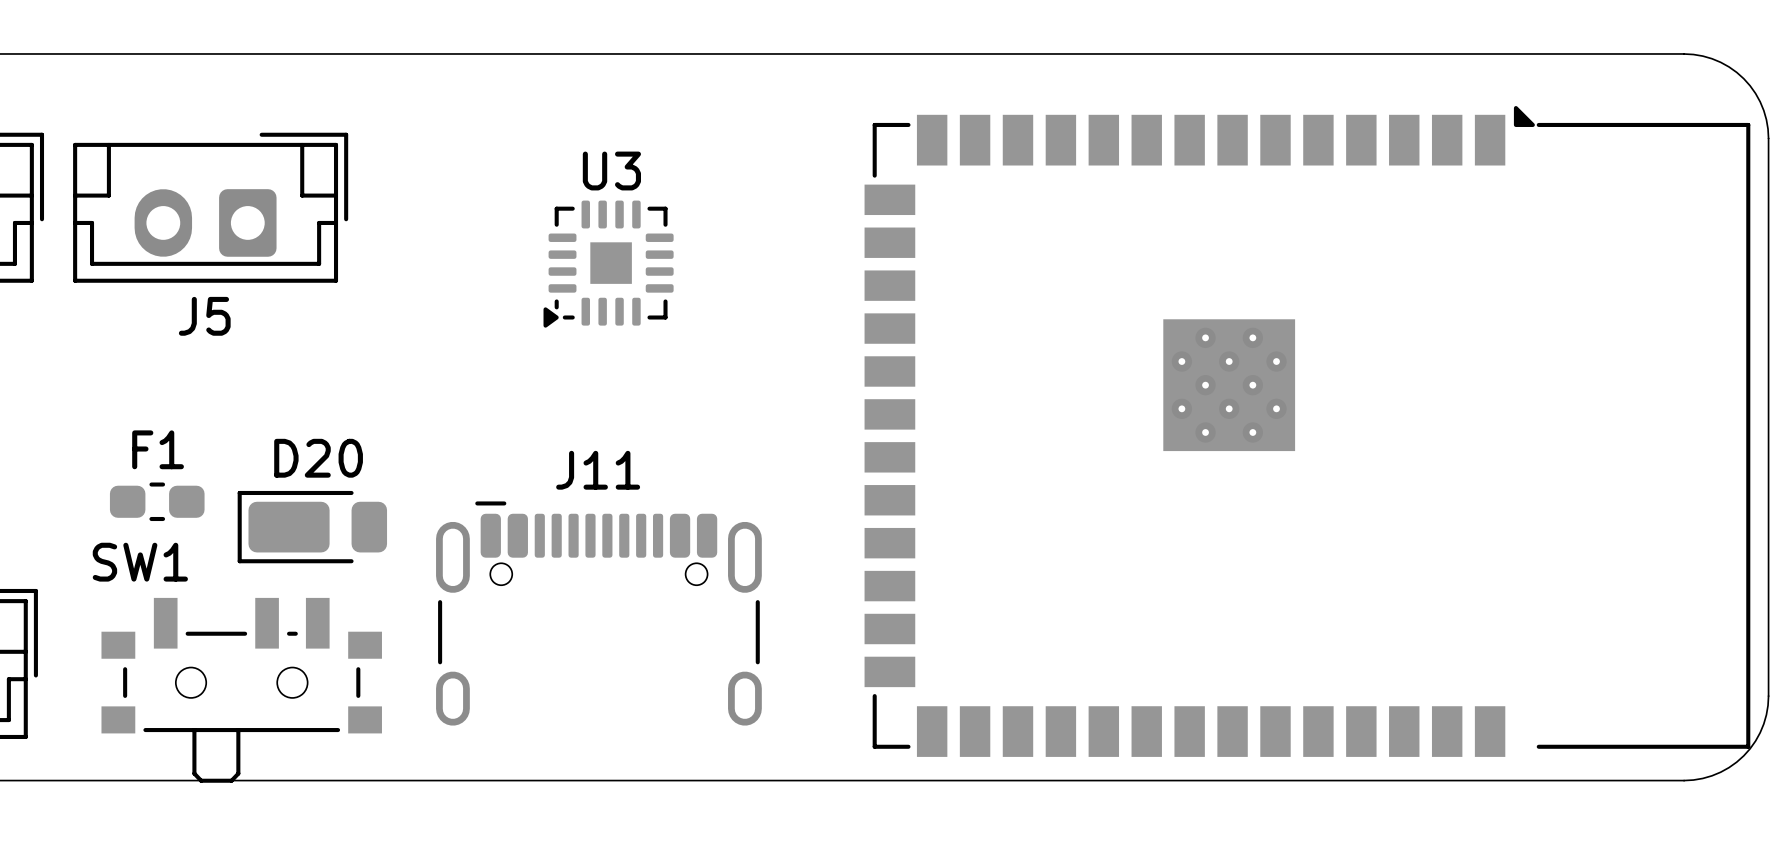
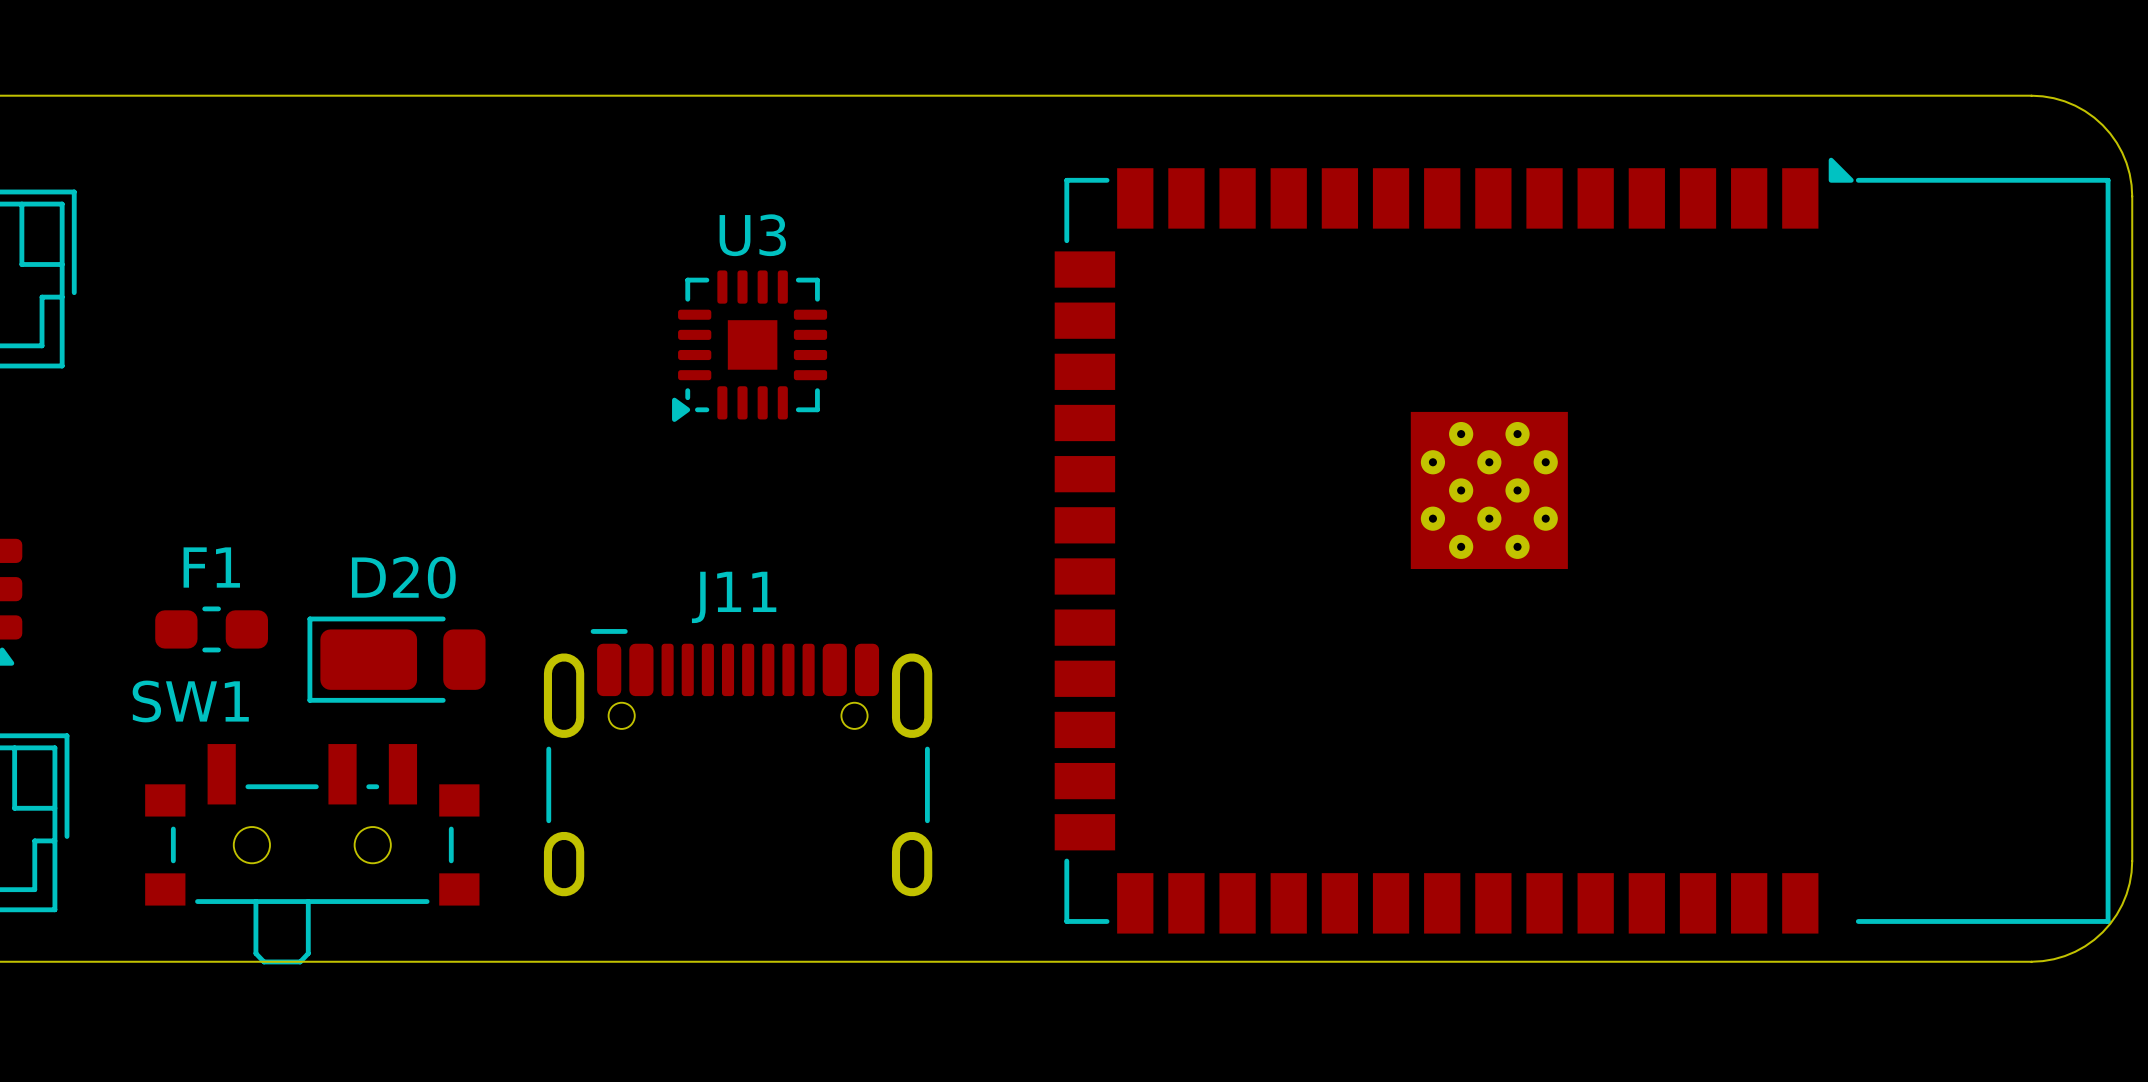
J5: (210, 207) -> none

